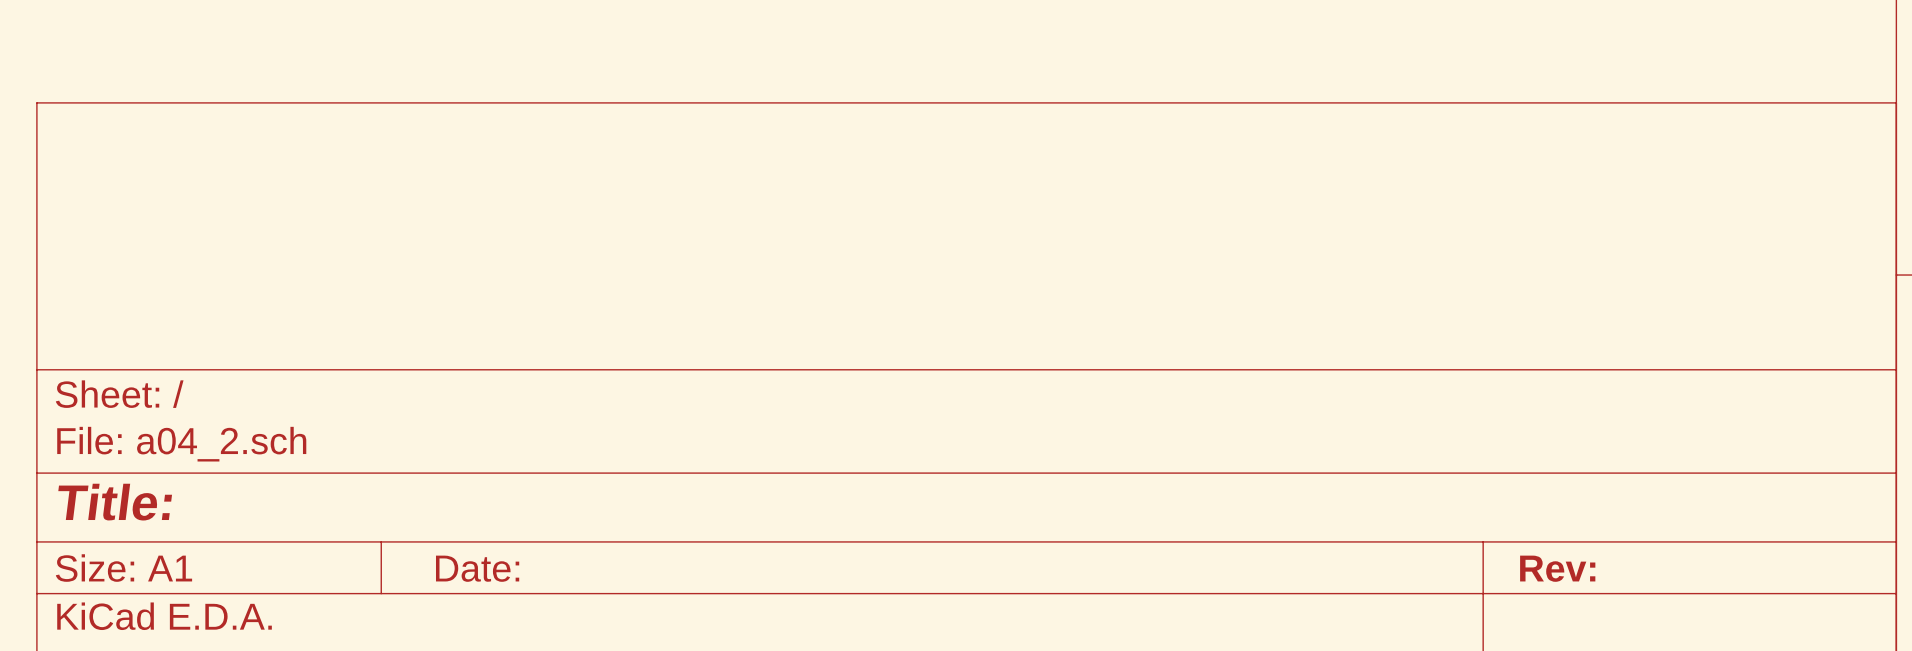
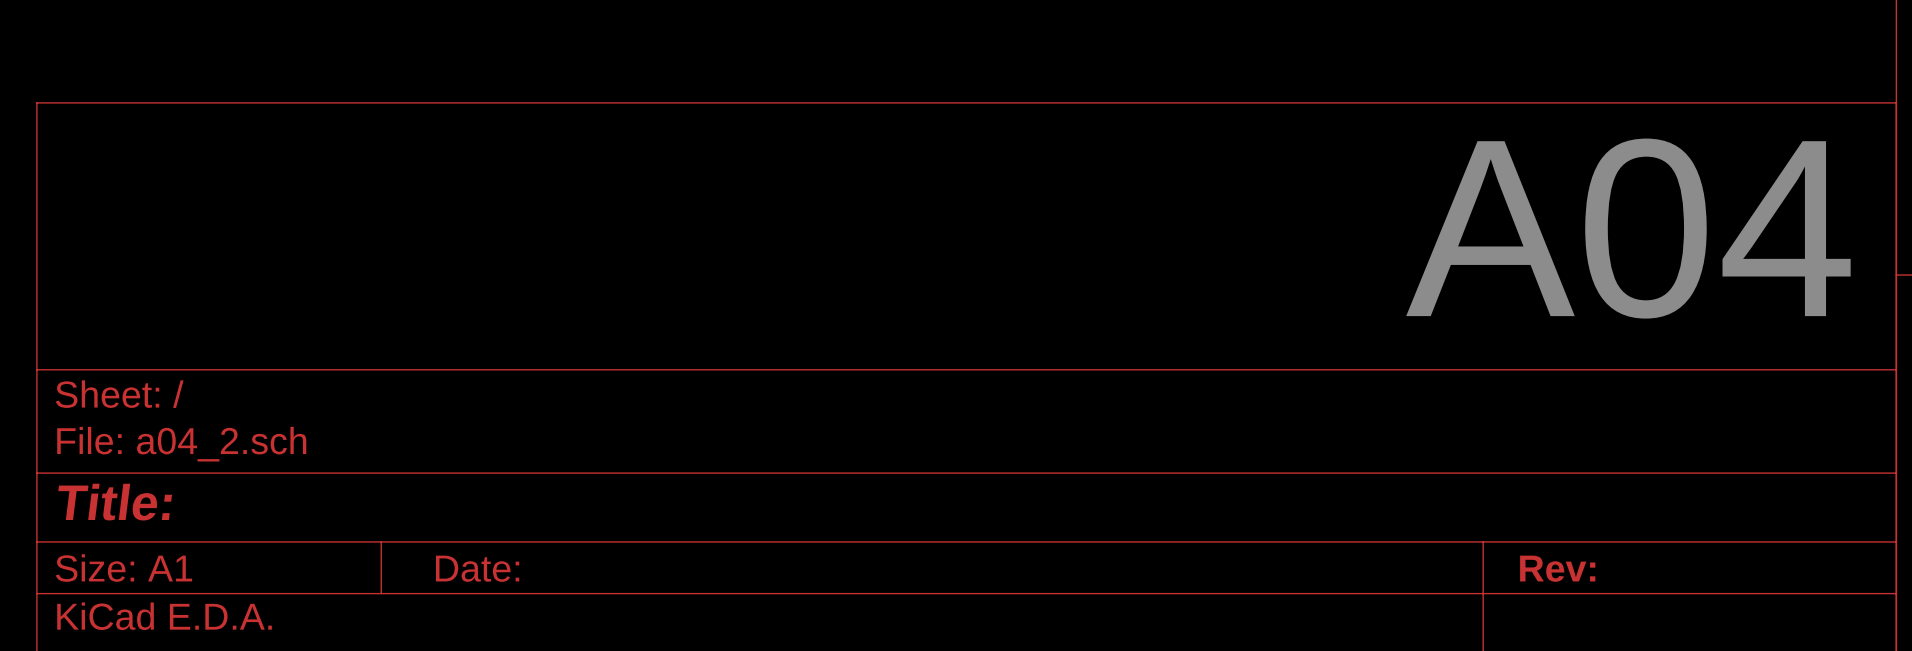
text: none -> A04 (1628, 228)

